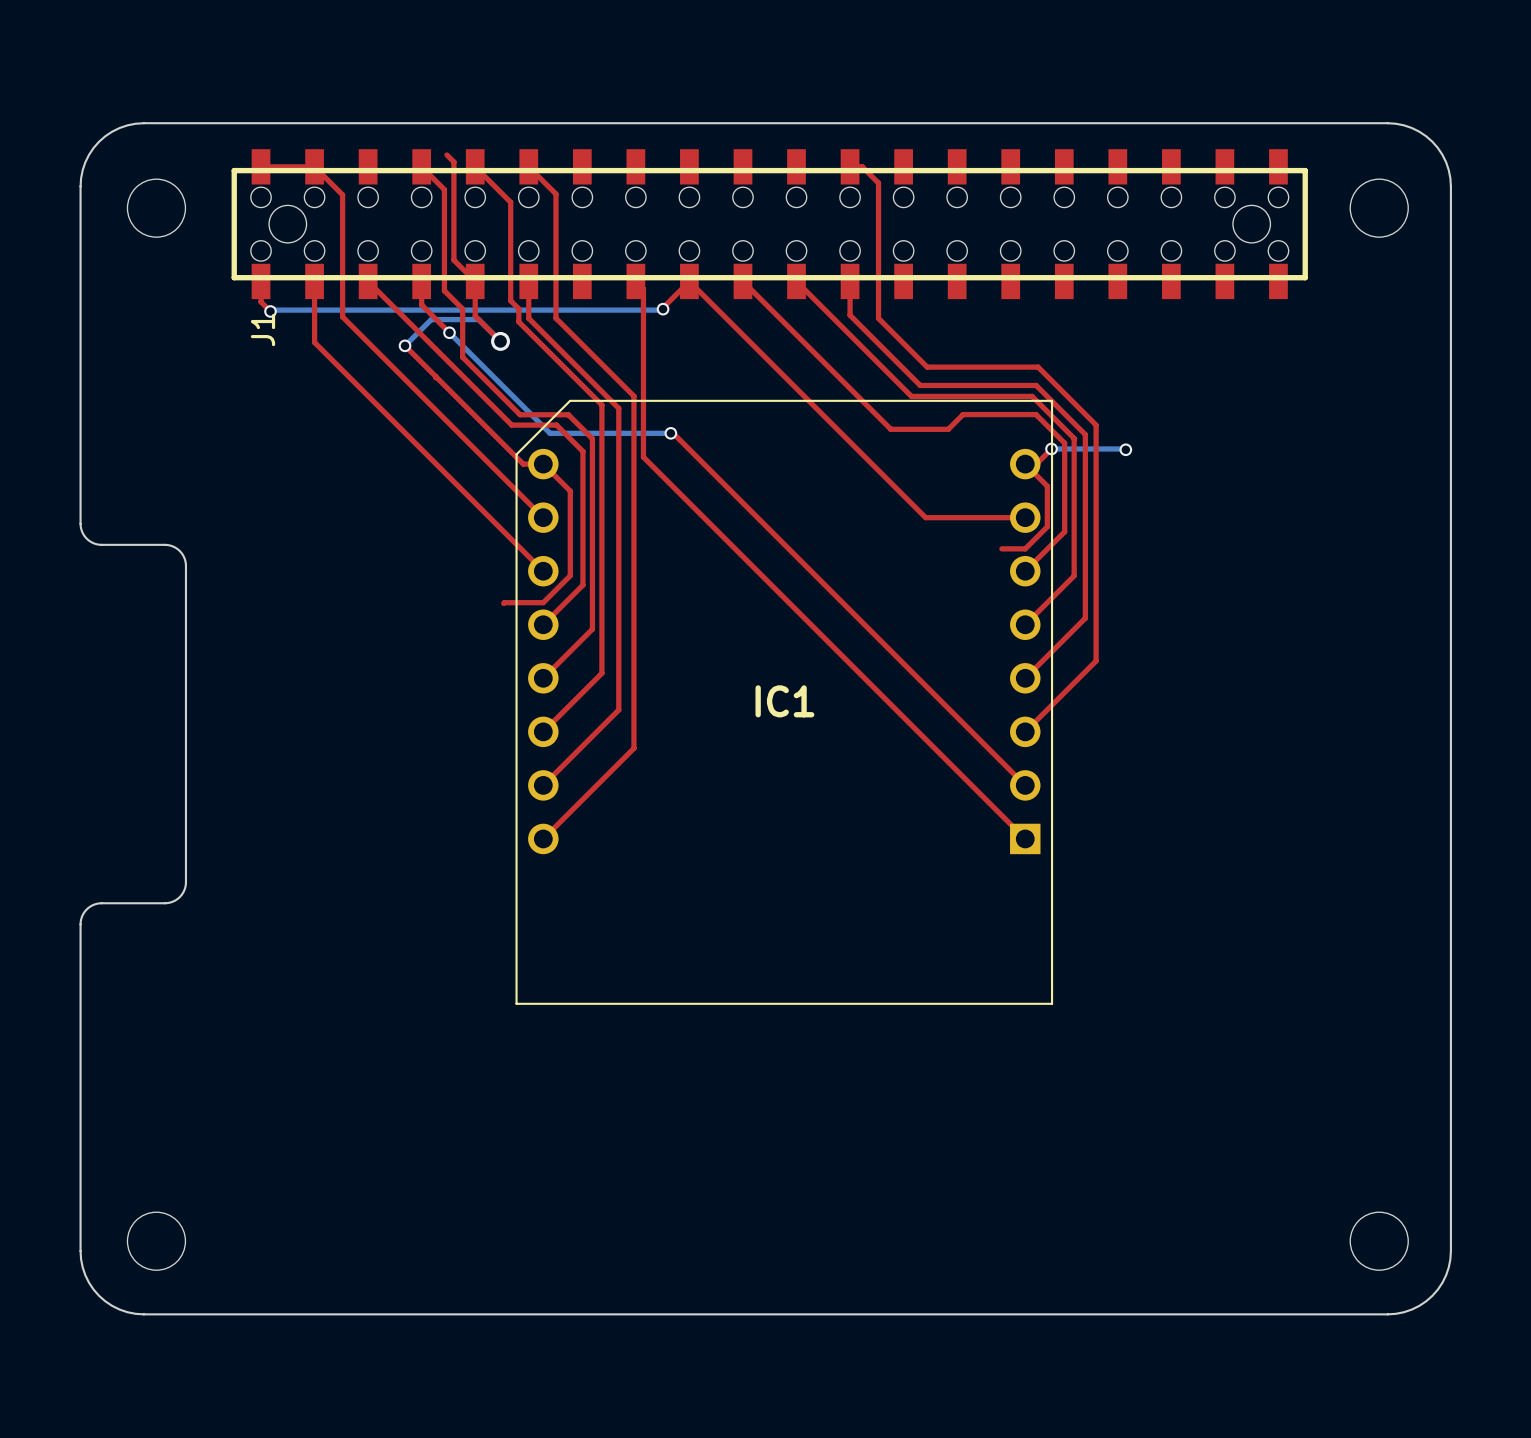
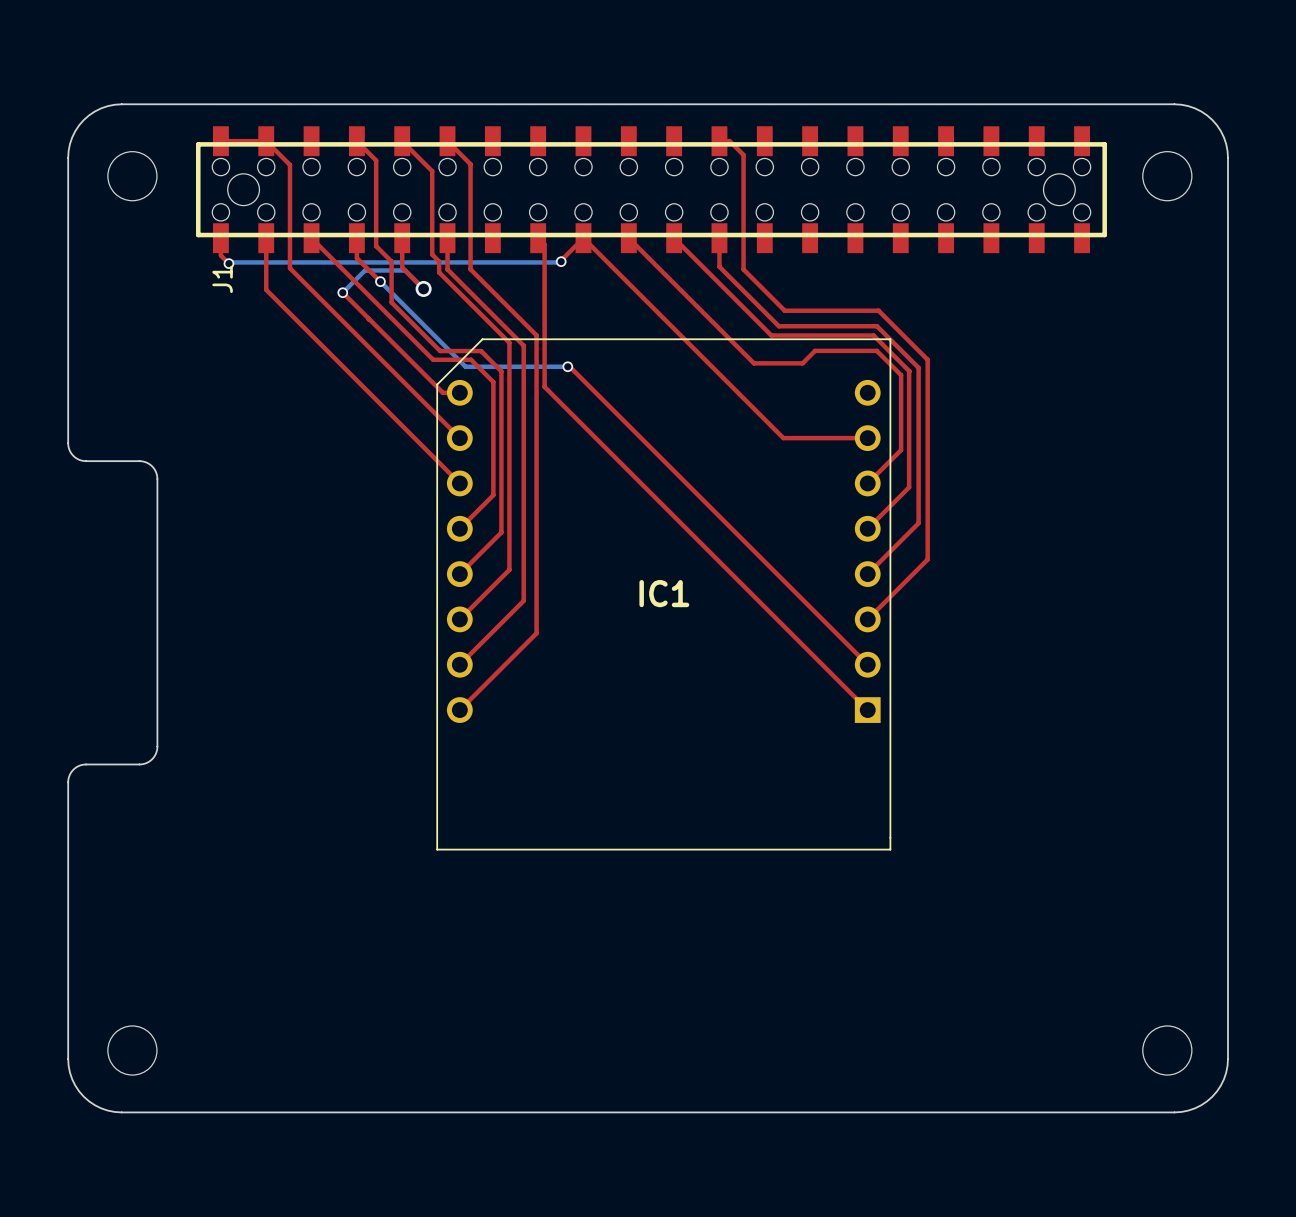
top track: (446, 155) (453, 162) (453, 260) (475, 281) -> none
top track: (1051, 448) (1036, 464) (1025, 464) (1047, 486) (1047, 526) (1025, 548) (1001, 548) -> none
bottom track: (1051, 448) (1125, 449) -> none
via: (1051, 448) -> none
via: (1125, 449) -> none
top track: (543, 464) (570, 491) (570, 575) (543, 602) (503, 603) -> none

